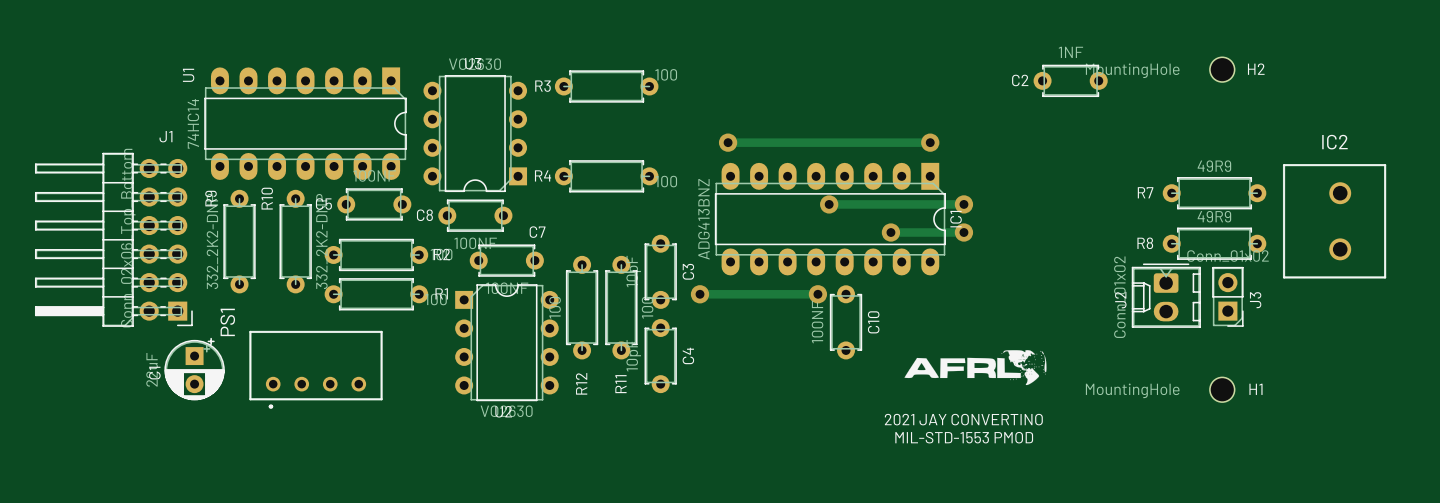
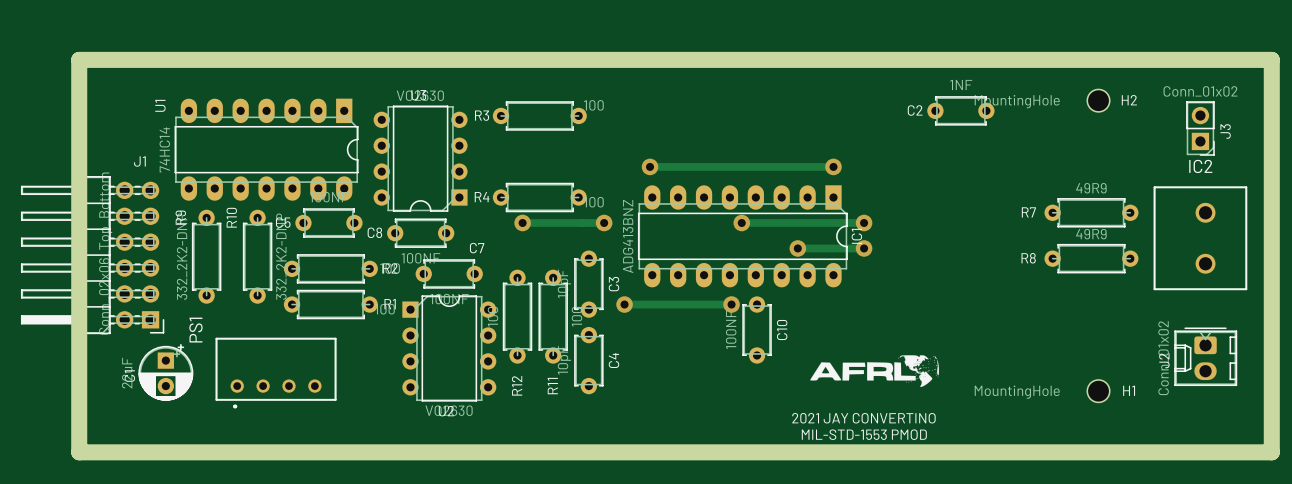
board edge: none -> (79, 59) (1271, 59) (1271, 452) (79, 452) (79, 59)
track: none -> (522, 222) (604, 222)
via: none -> (522, 222)
via: none -> (604, 222)
J2 position: (1166, 295) -> (1205, 356)
J3 position: (1227, 296) -> (1200, 128)

